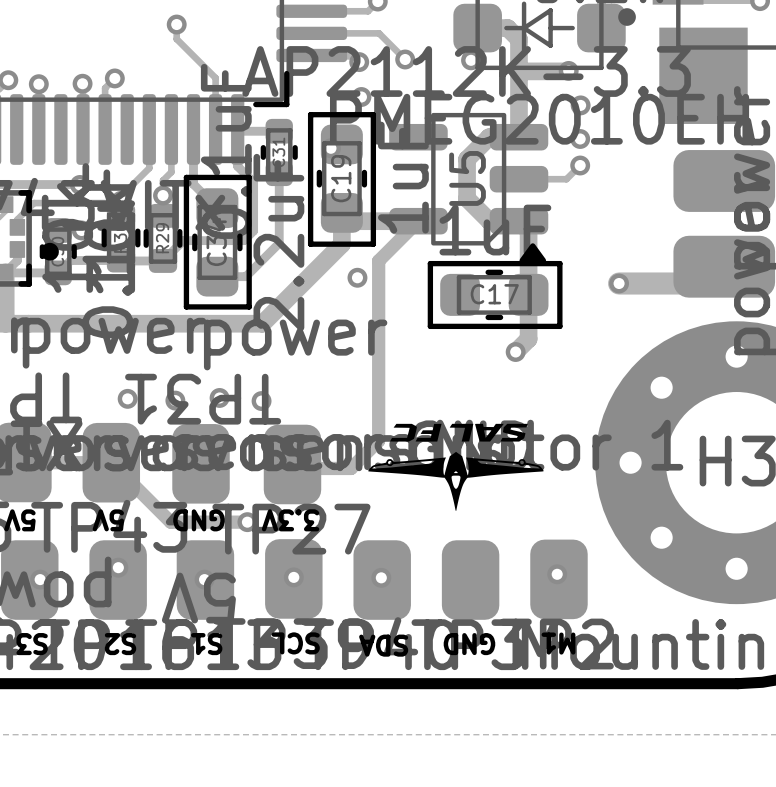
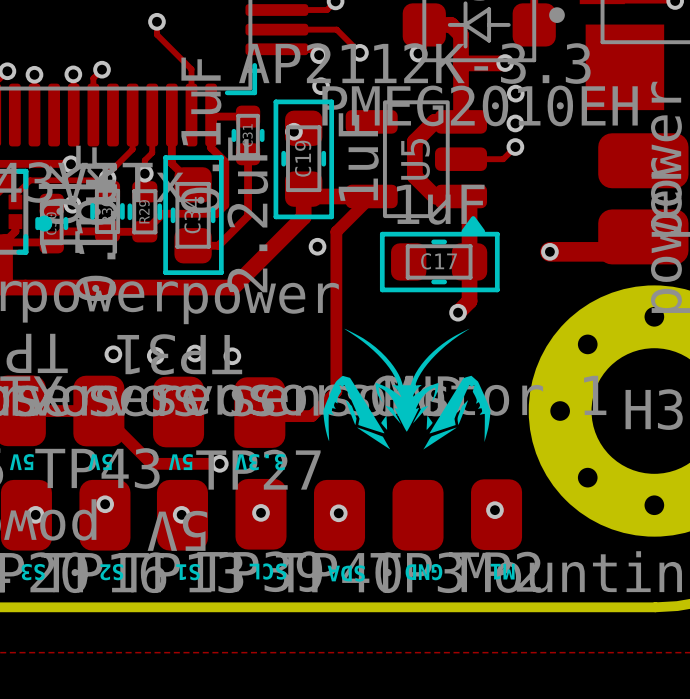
drawing shape: [368, 423, 544, 511] -> [323, 328, 491, 450]
text: GND (199, 520) -> 5V (180, 462)

